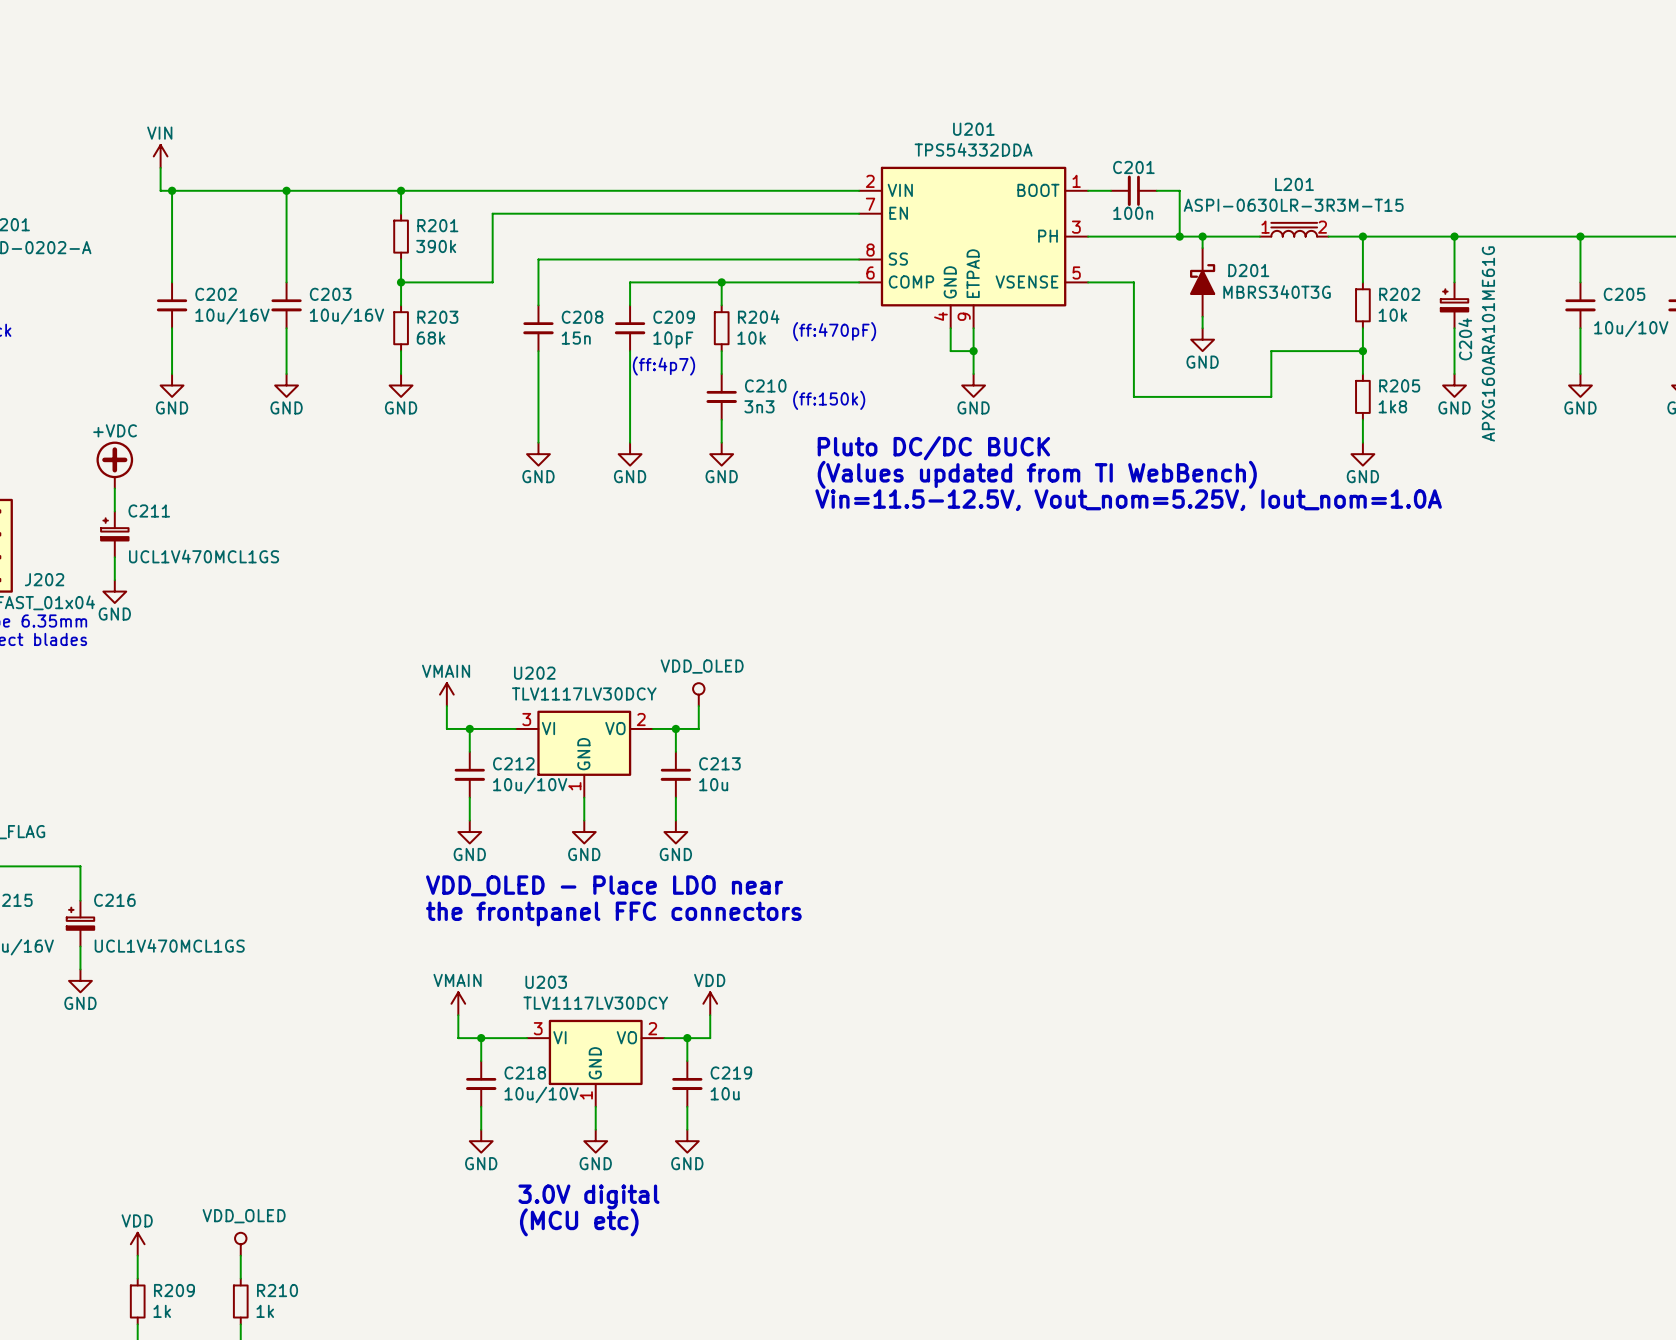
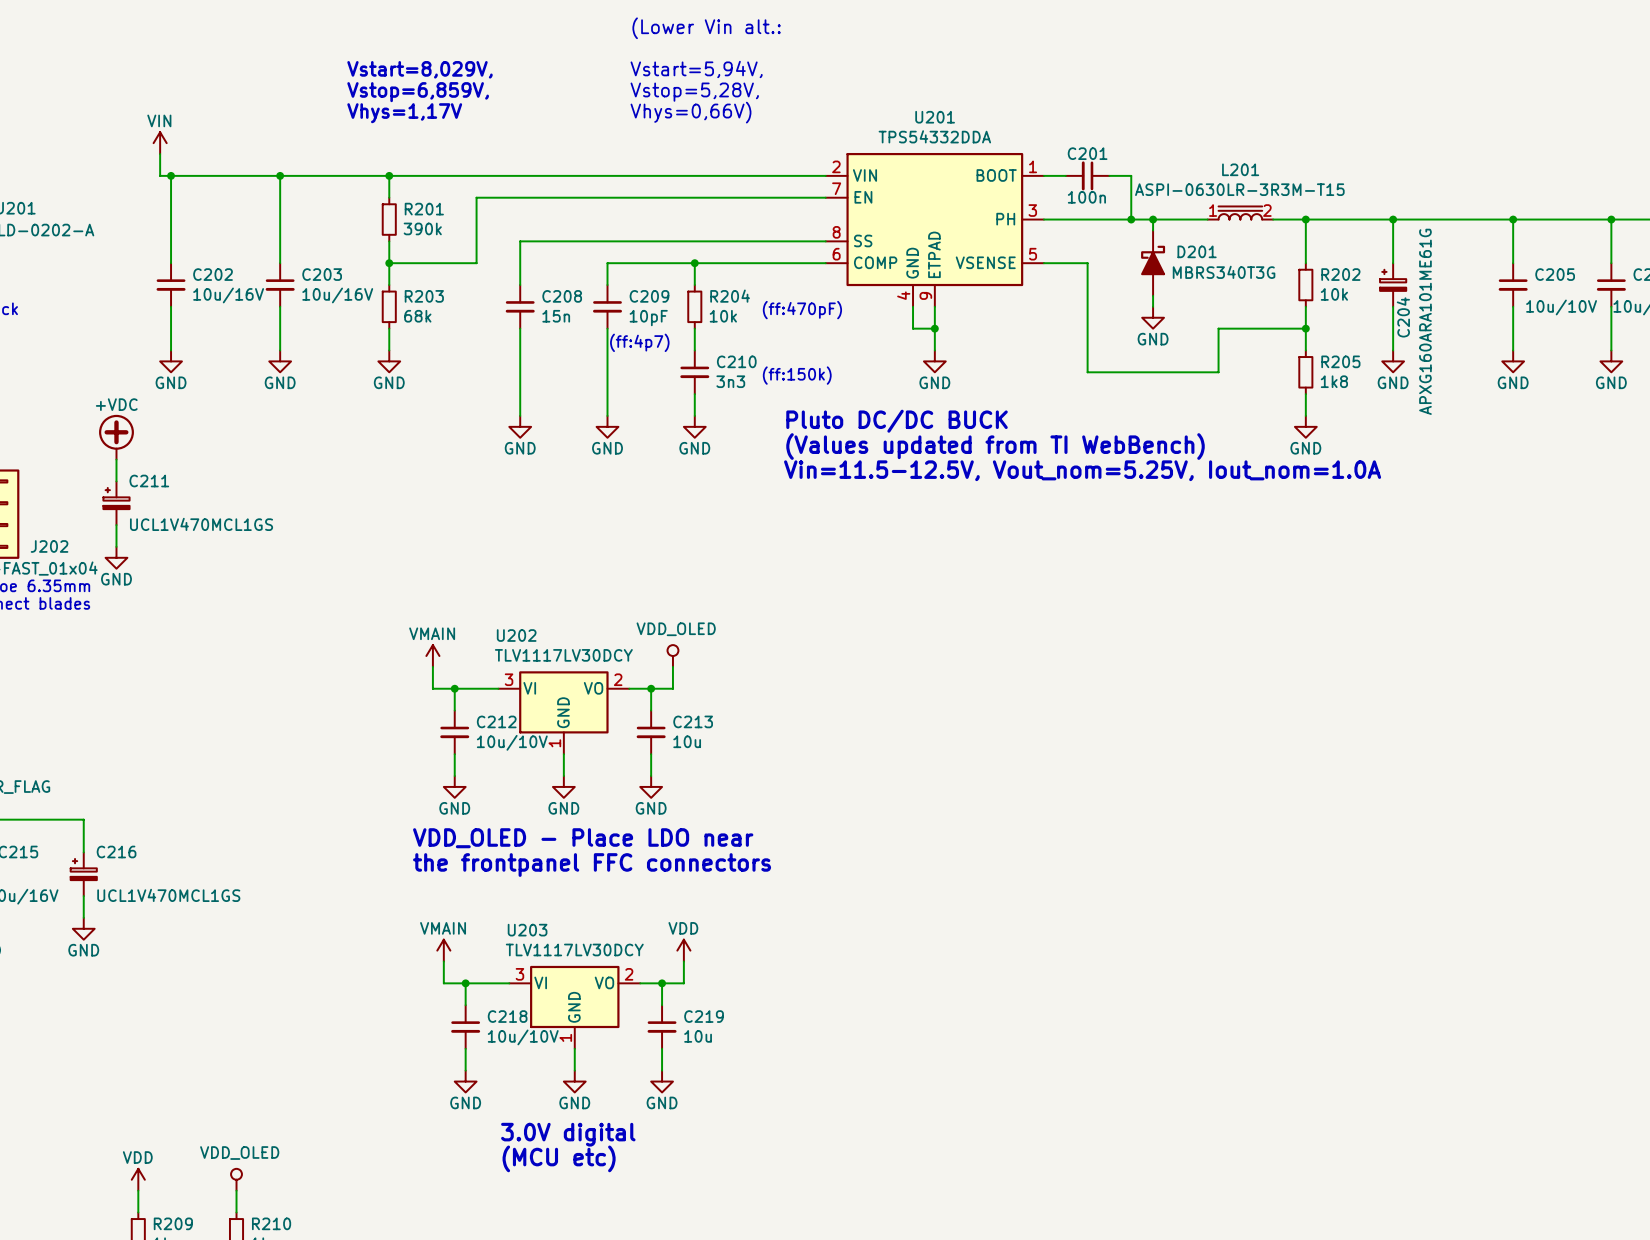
text: none -> (Lower Vin alt.: (706, 28)
text: none -> Vstart=8,029V, (419, 69)
text: none -> Vstart=5,94V, (696, 69)
text: none -> Vstop=6,859V, (418, 92)
text: none -> Vstop=5,28V, (694, 92)
text: none -> Vhys=0,66V) (690, 112)
text: none -> Vhys=1,17V (404, 113)

